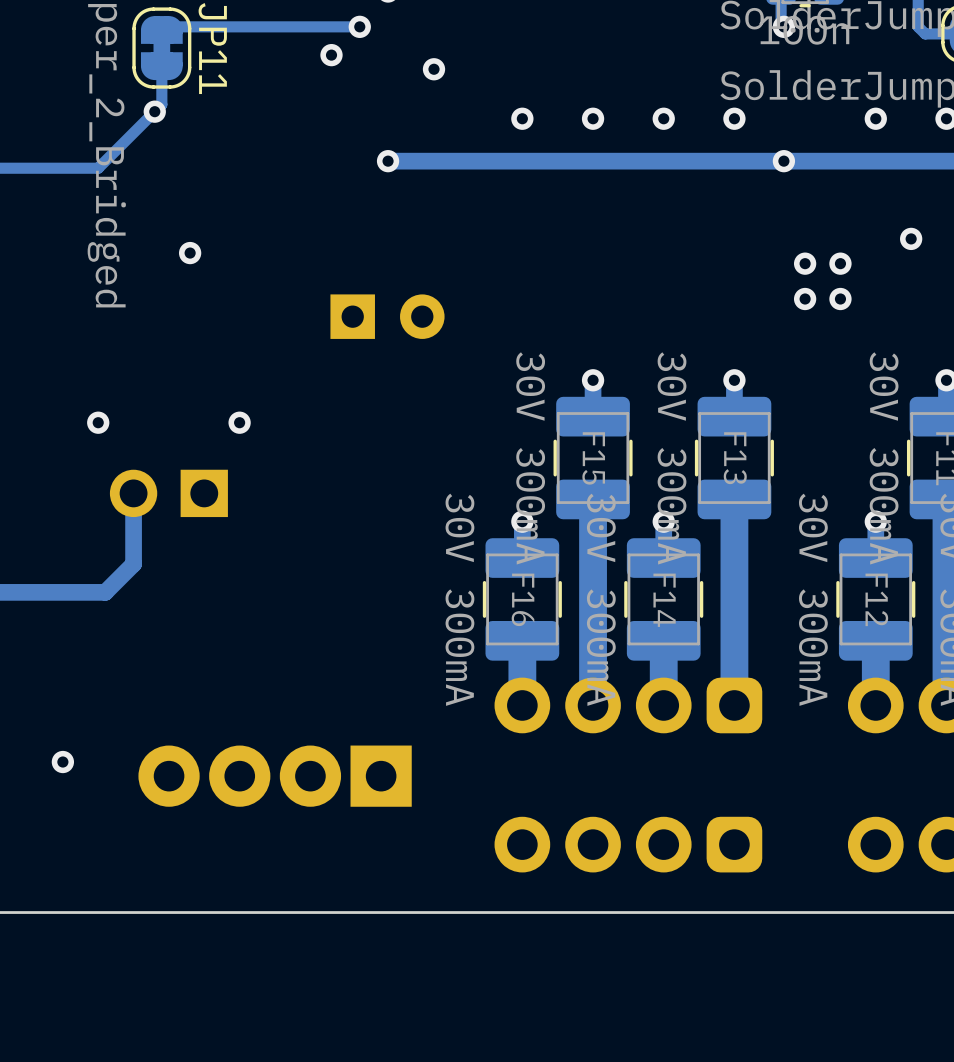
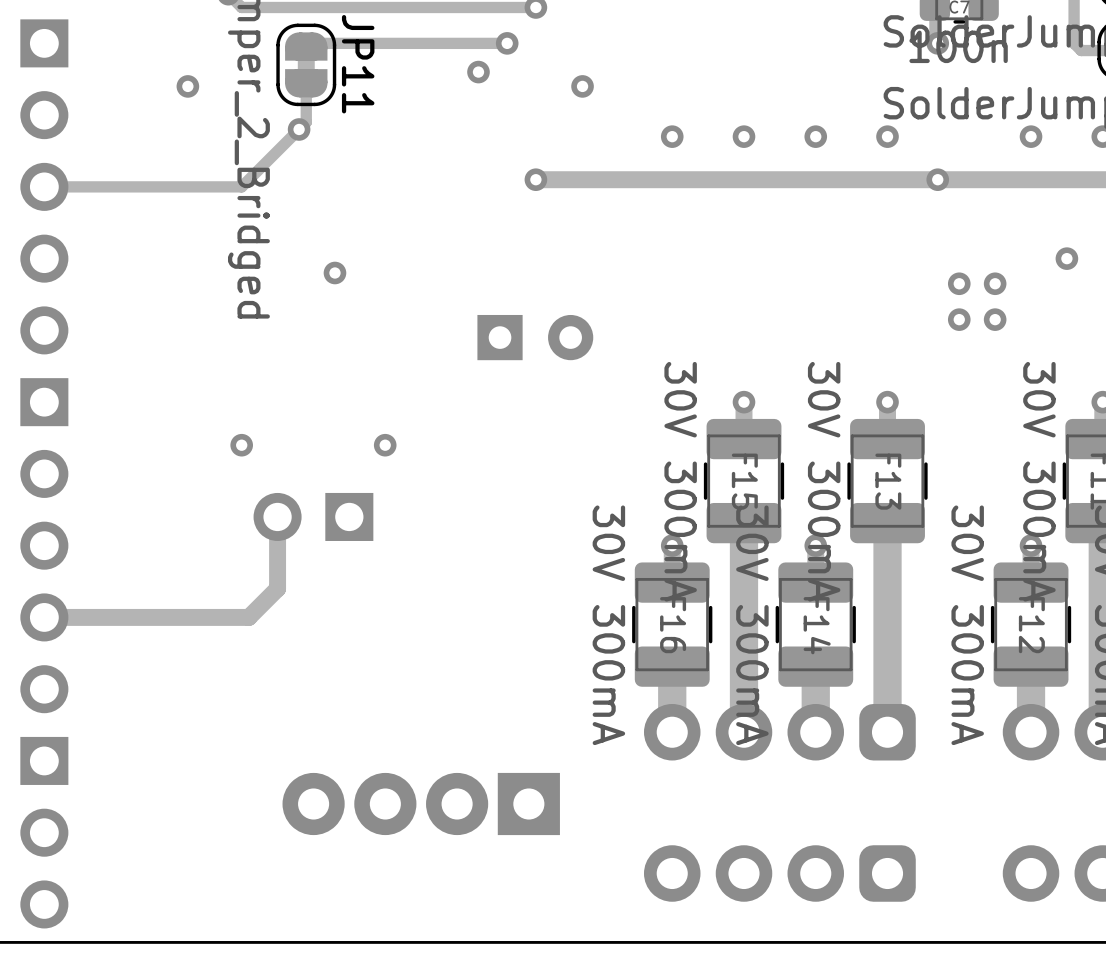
via: none -> (187, 86)
via: (62, 762) -> none

